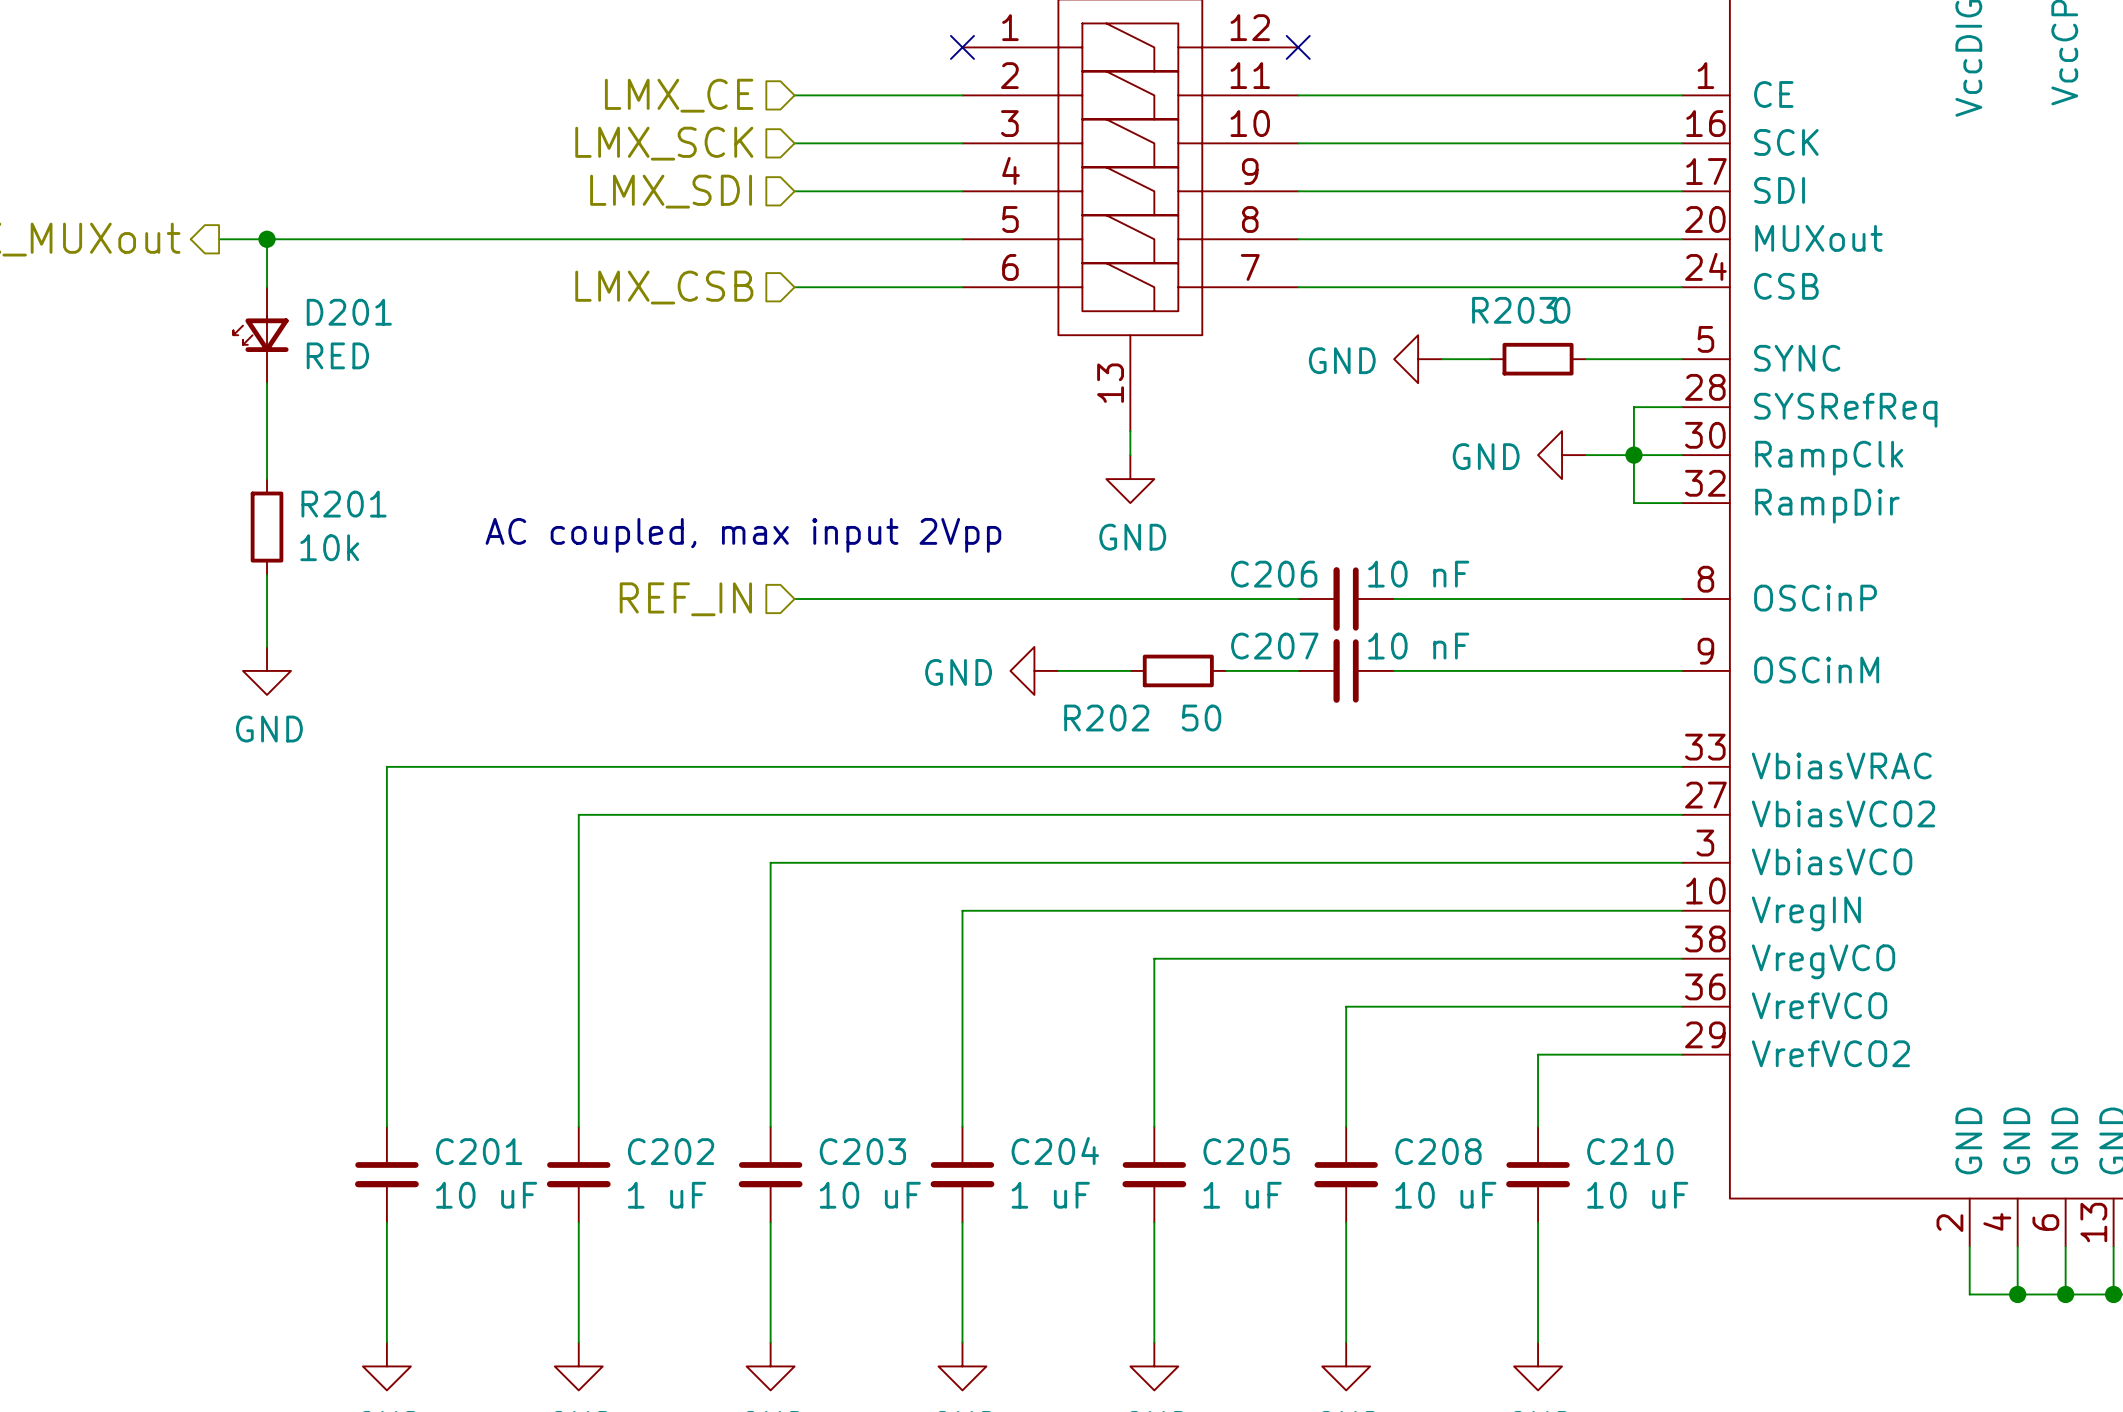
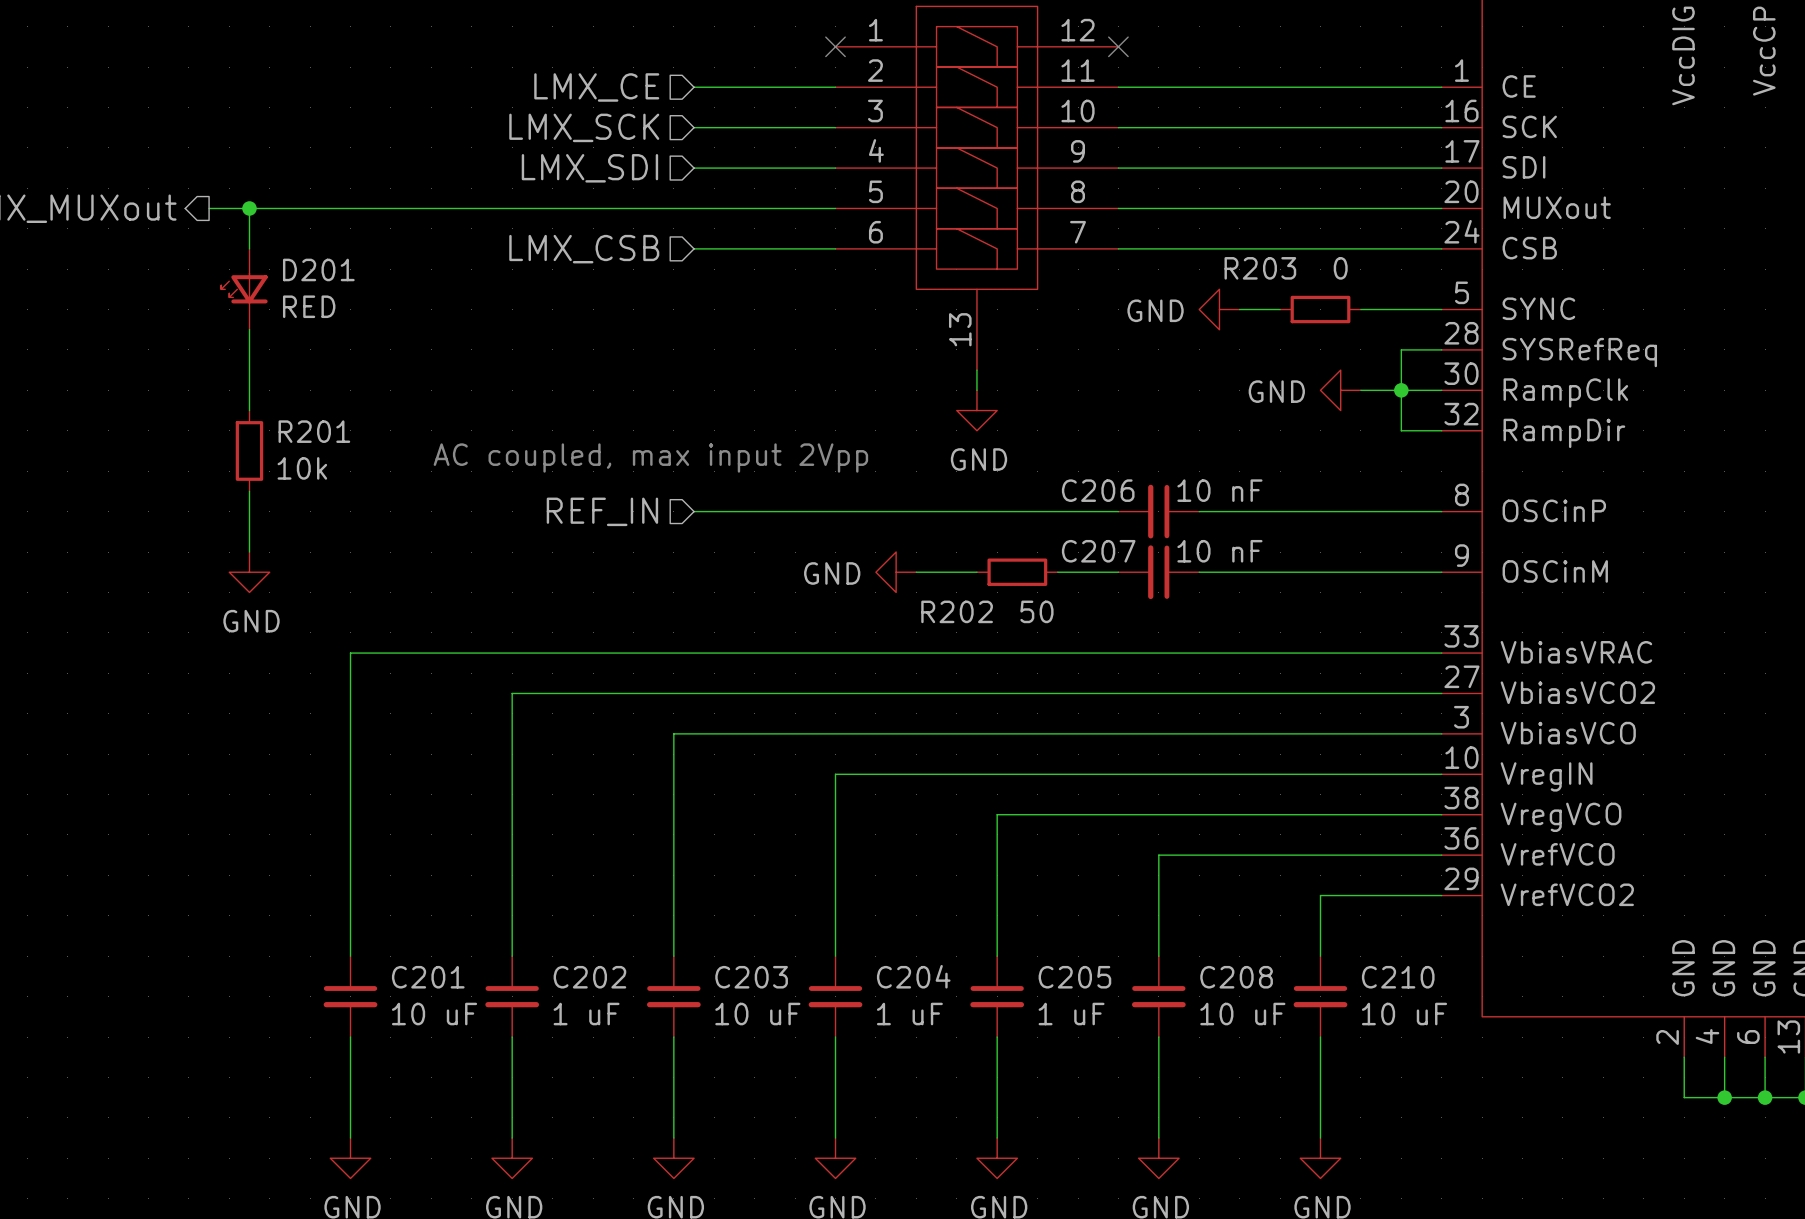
R203 name position: R203 (1514, 310) -> R203 (1260, 268)

